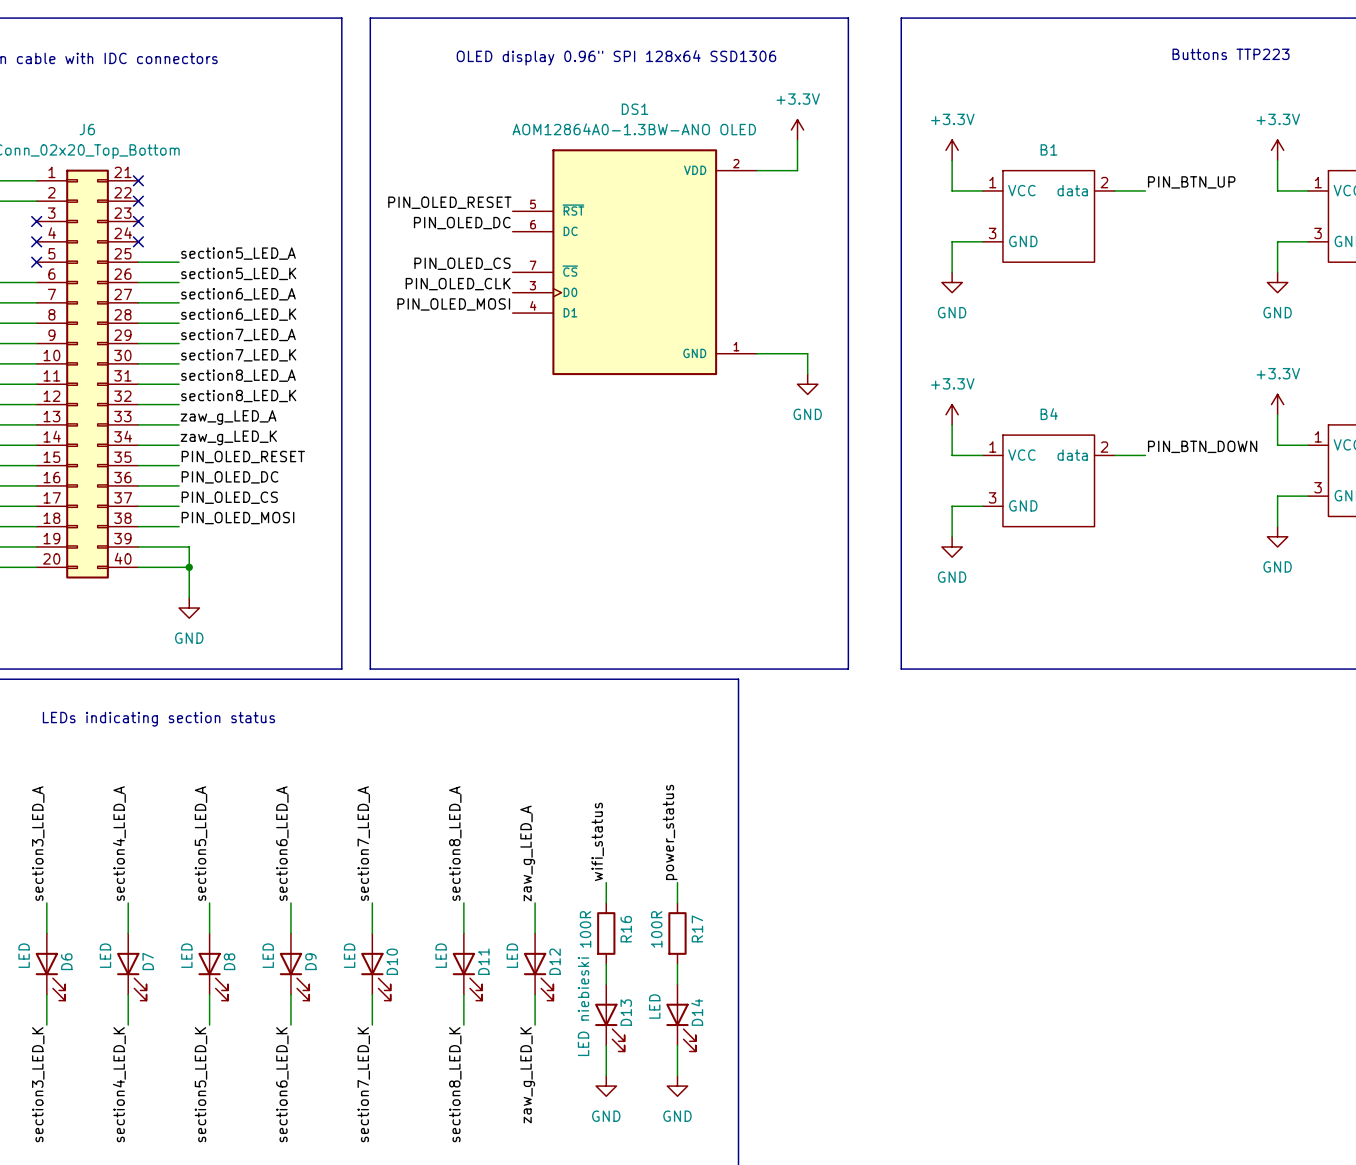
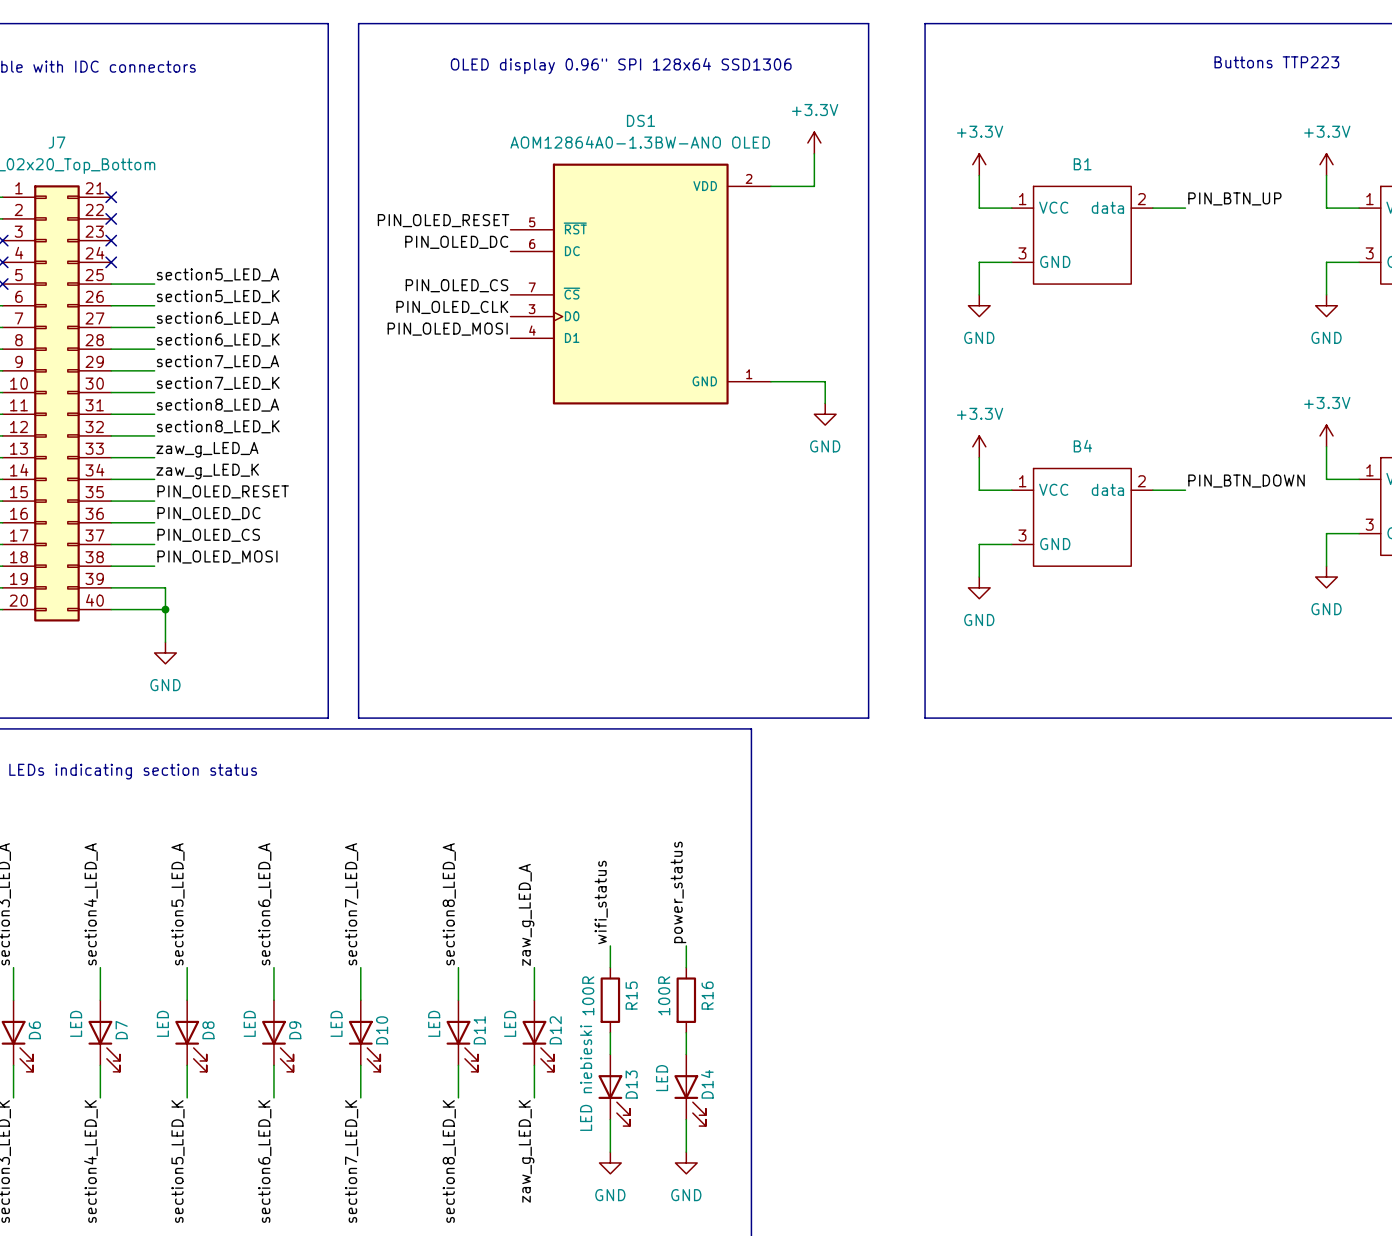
J6 name: J6 (87, 129) -> J7 (56, 142)
R17 name: R17 (697, 928) -> R16 (707, 995)
R16 name: R16 (626, 929) -> R15 (631, 995)

